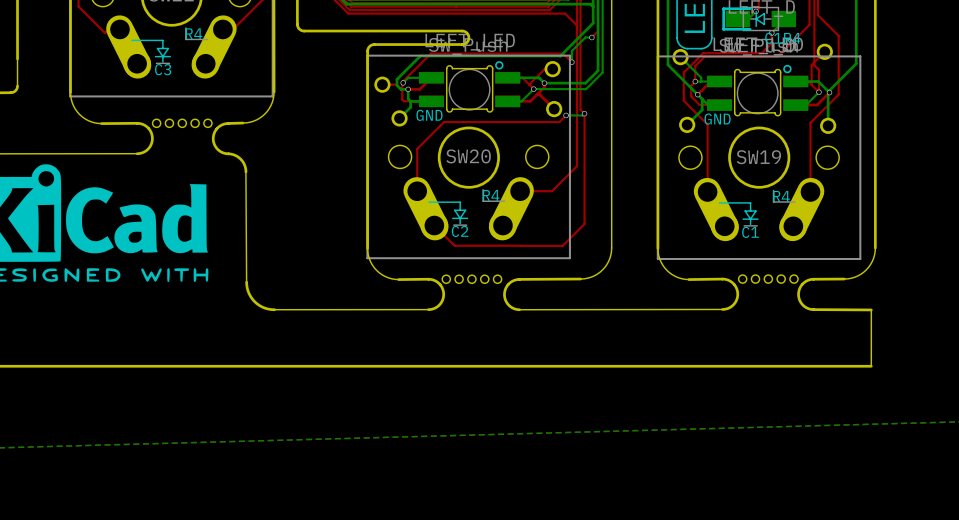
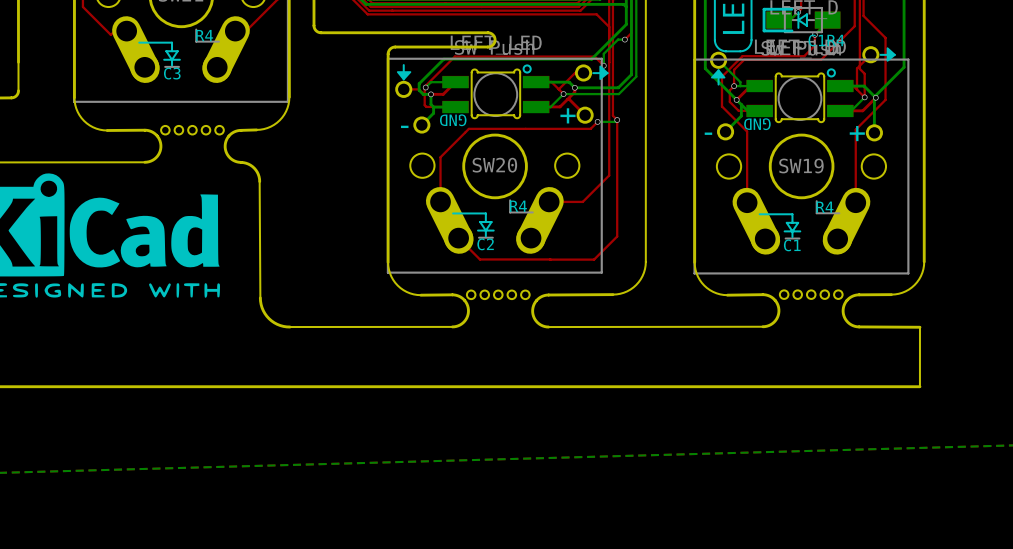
part footprint: [816, 43, 833, 60] -> [862, 46, 896, 64]
part footprint: [672, 48, 689, 66] -> [710, 51, 728, 86]
part footprint: [544, 61, 561, 78] -> [574, 64, 609, 82]
part footprint: [374, 76, 391, 93] -> [395, 64, 413, 98]
part text: none -> + (568, 115)
part text rotation: 0° (429, 115) -> 180° (453, 120)
part text: none -> - (404, 126)
part text rotation: 0° (717, 119) -> 180° (757, 124)
part text: none -> - (708, 133)
part text: none -> + (857, 133)

